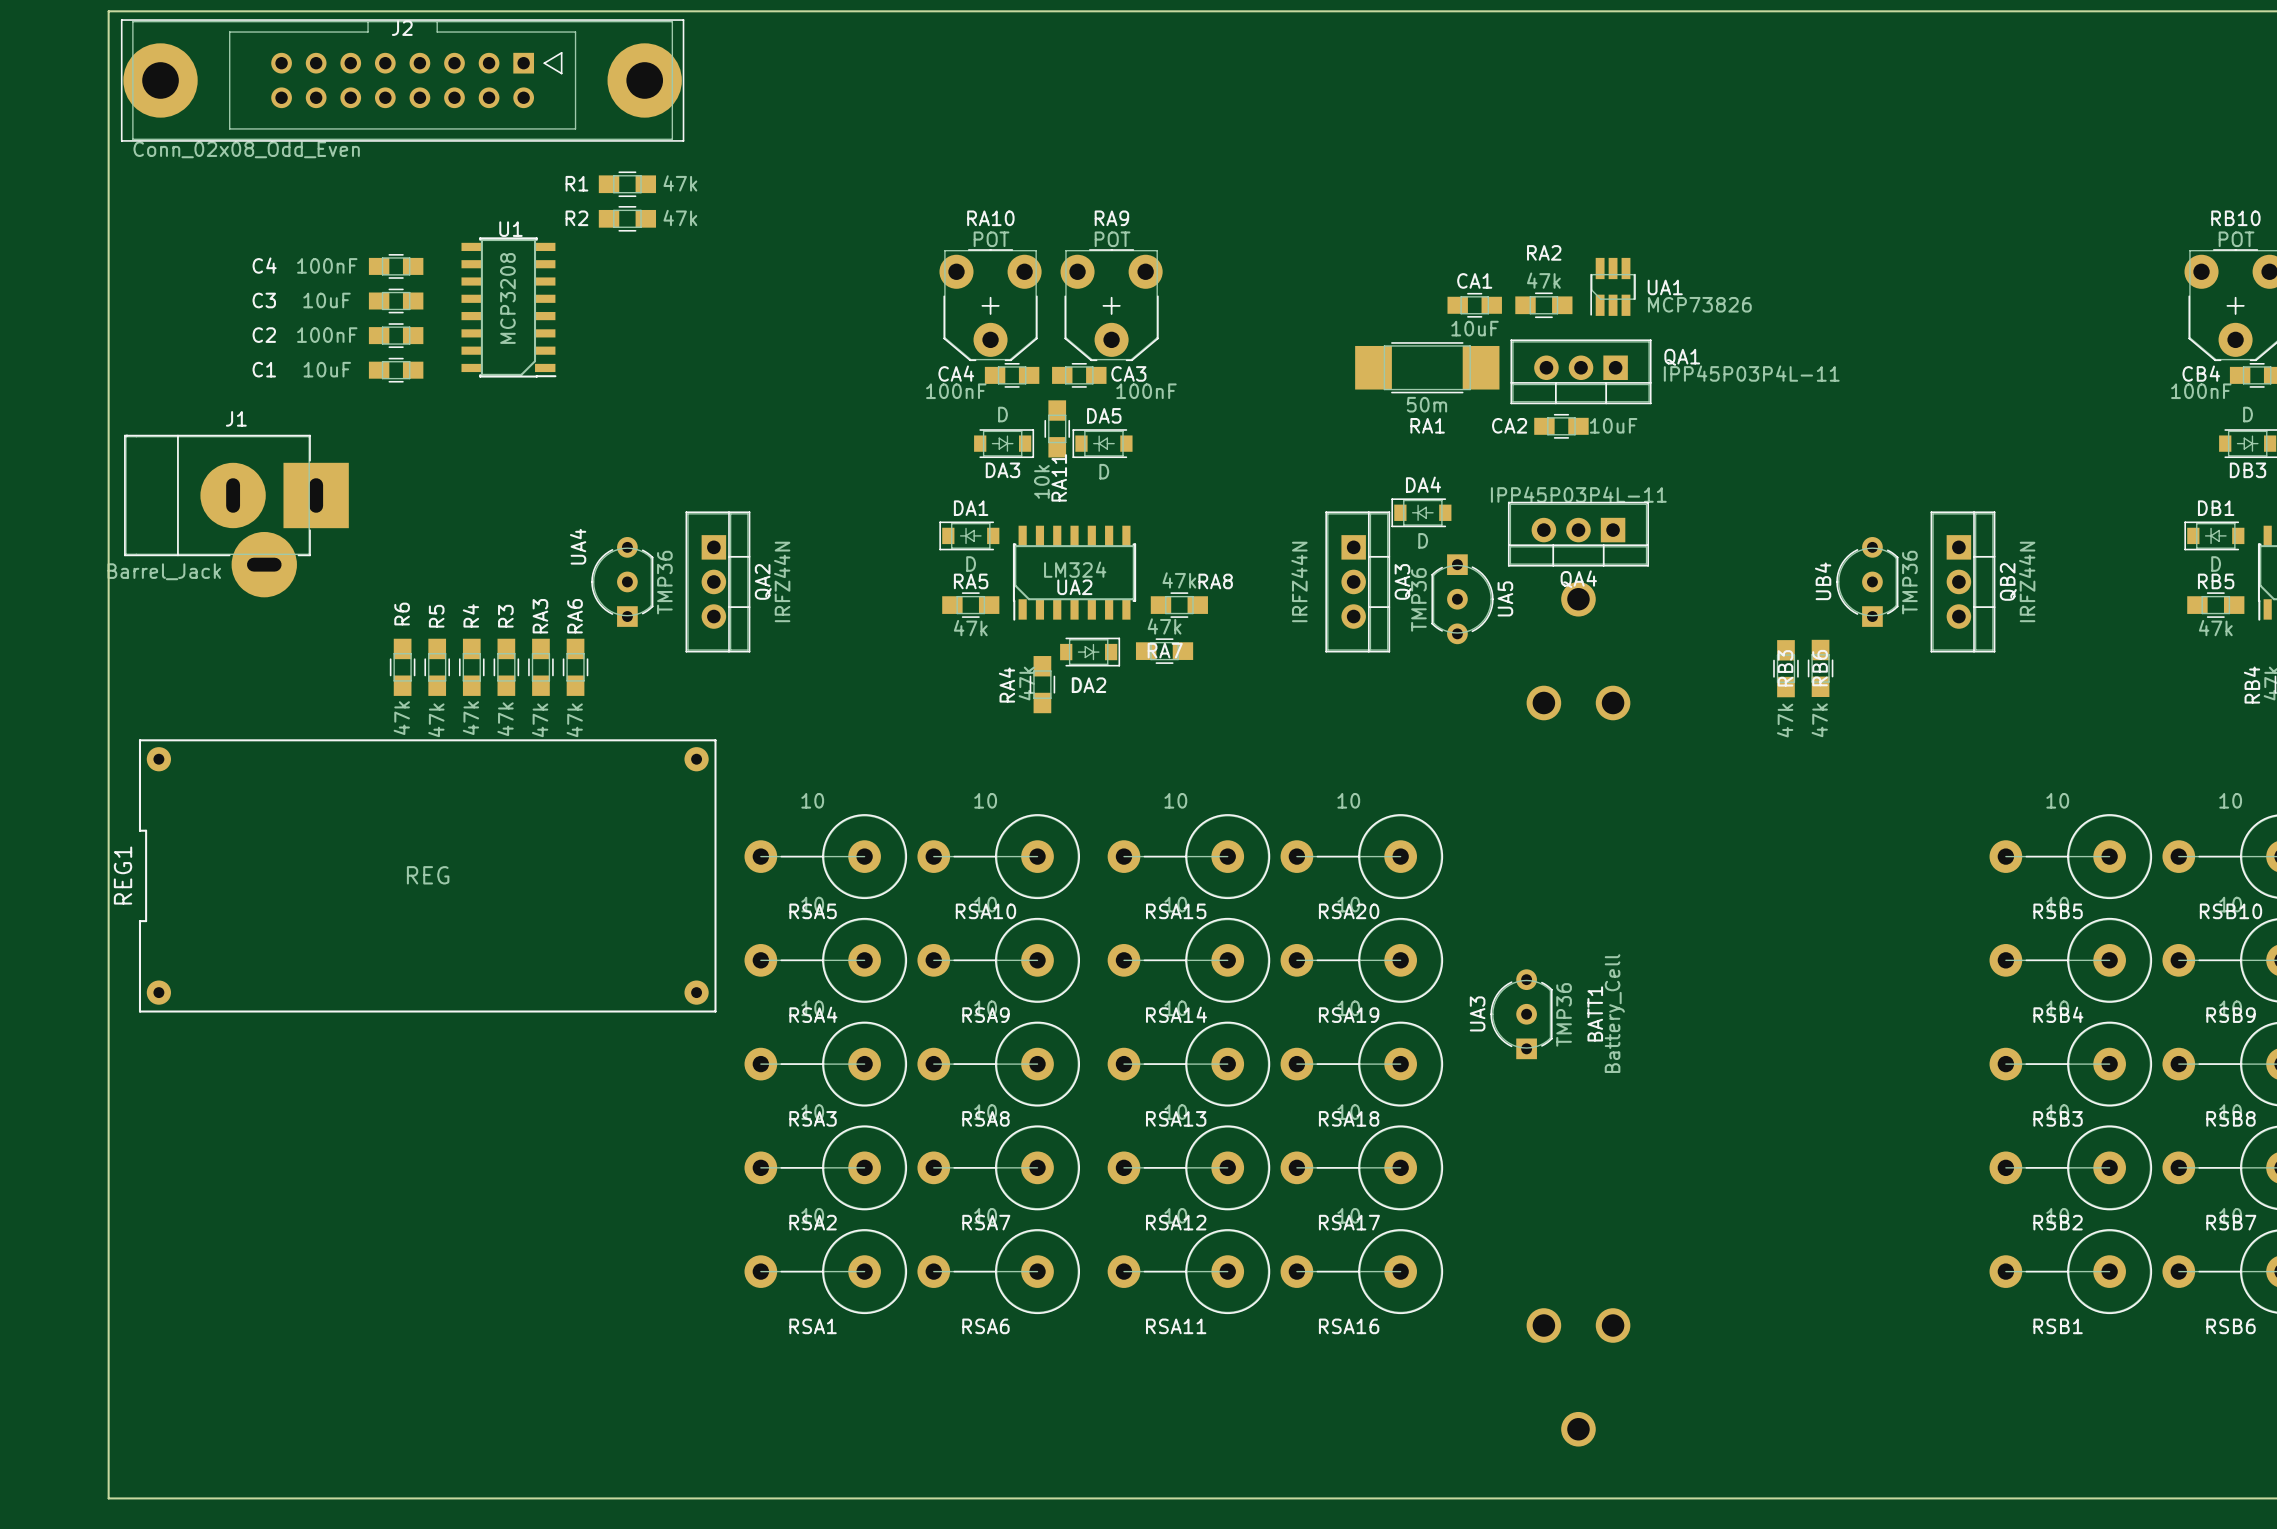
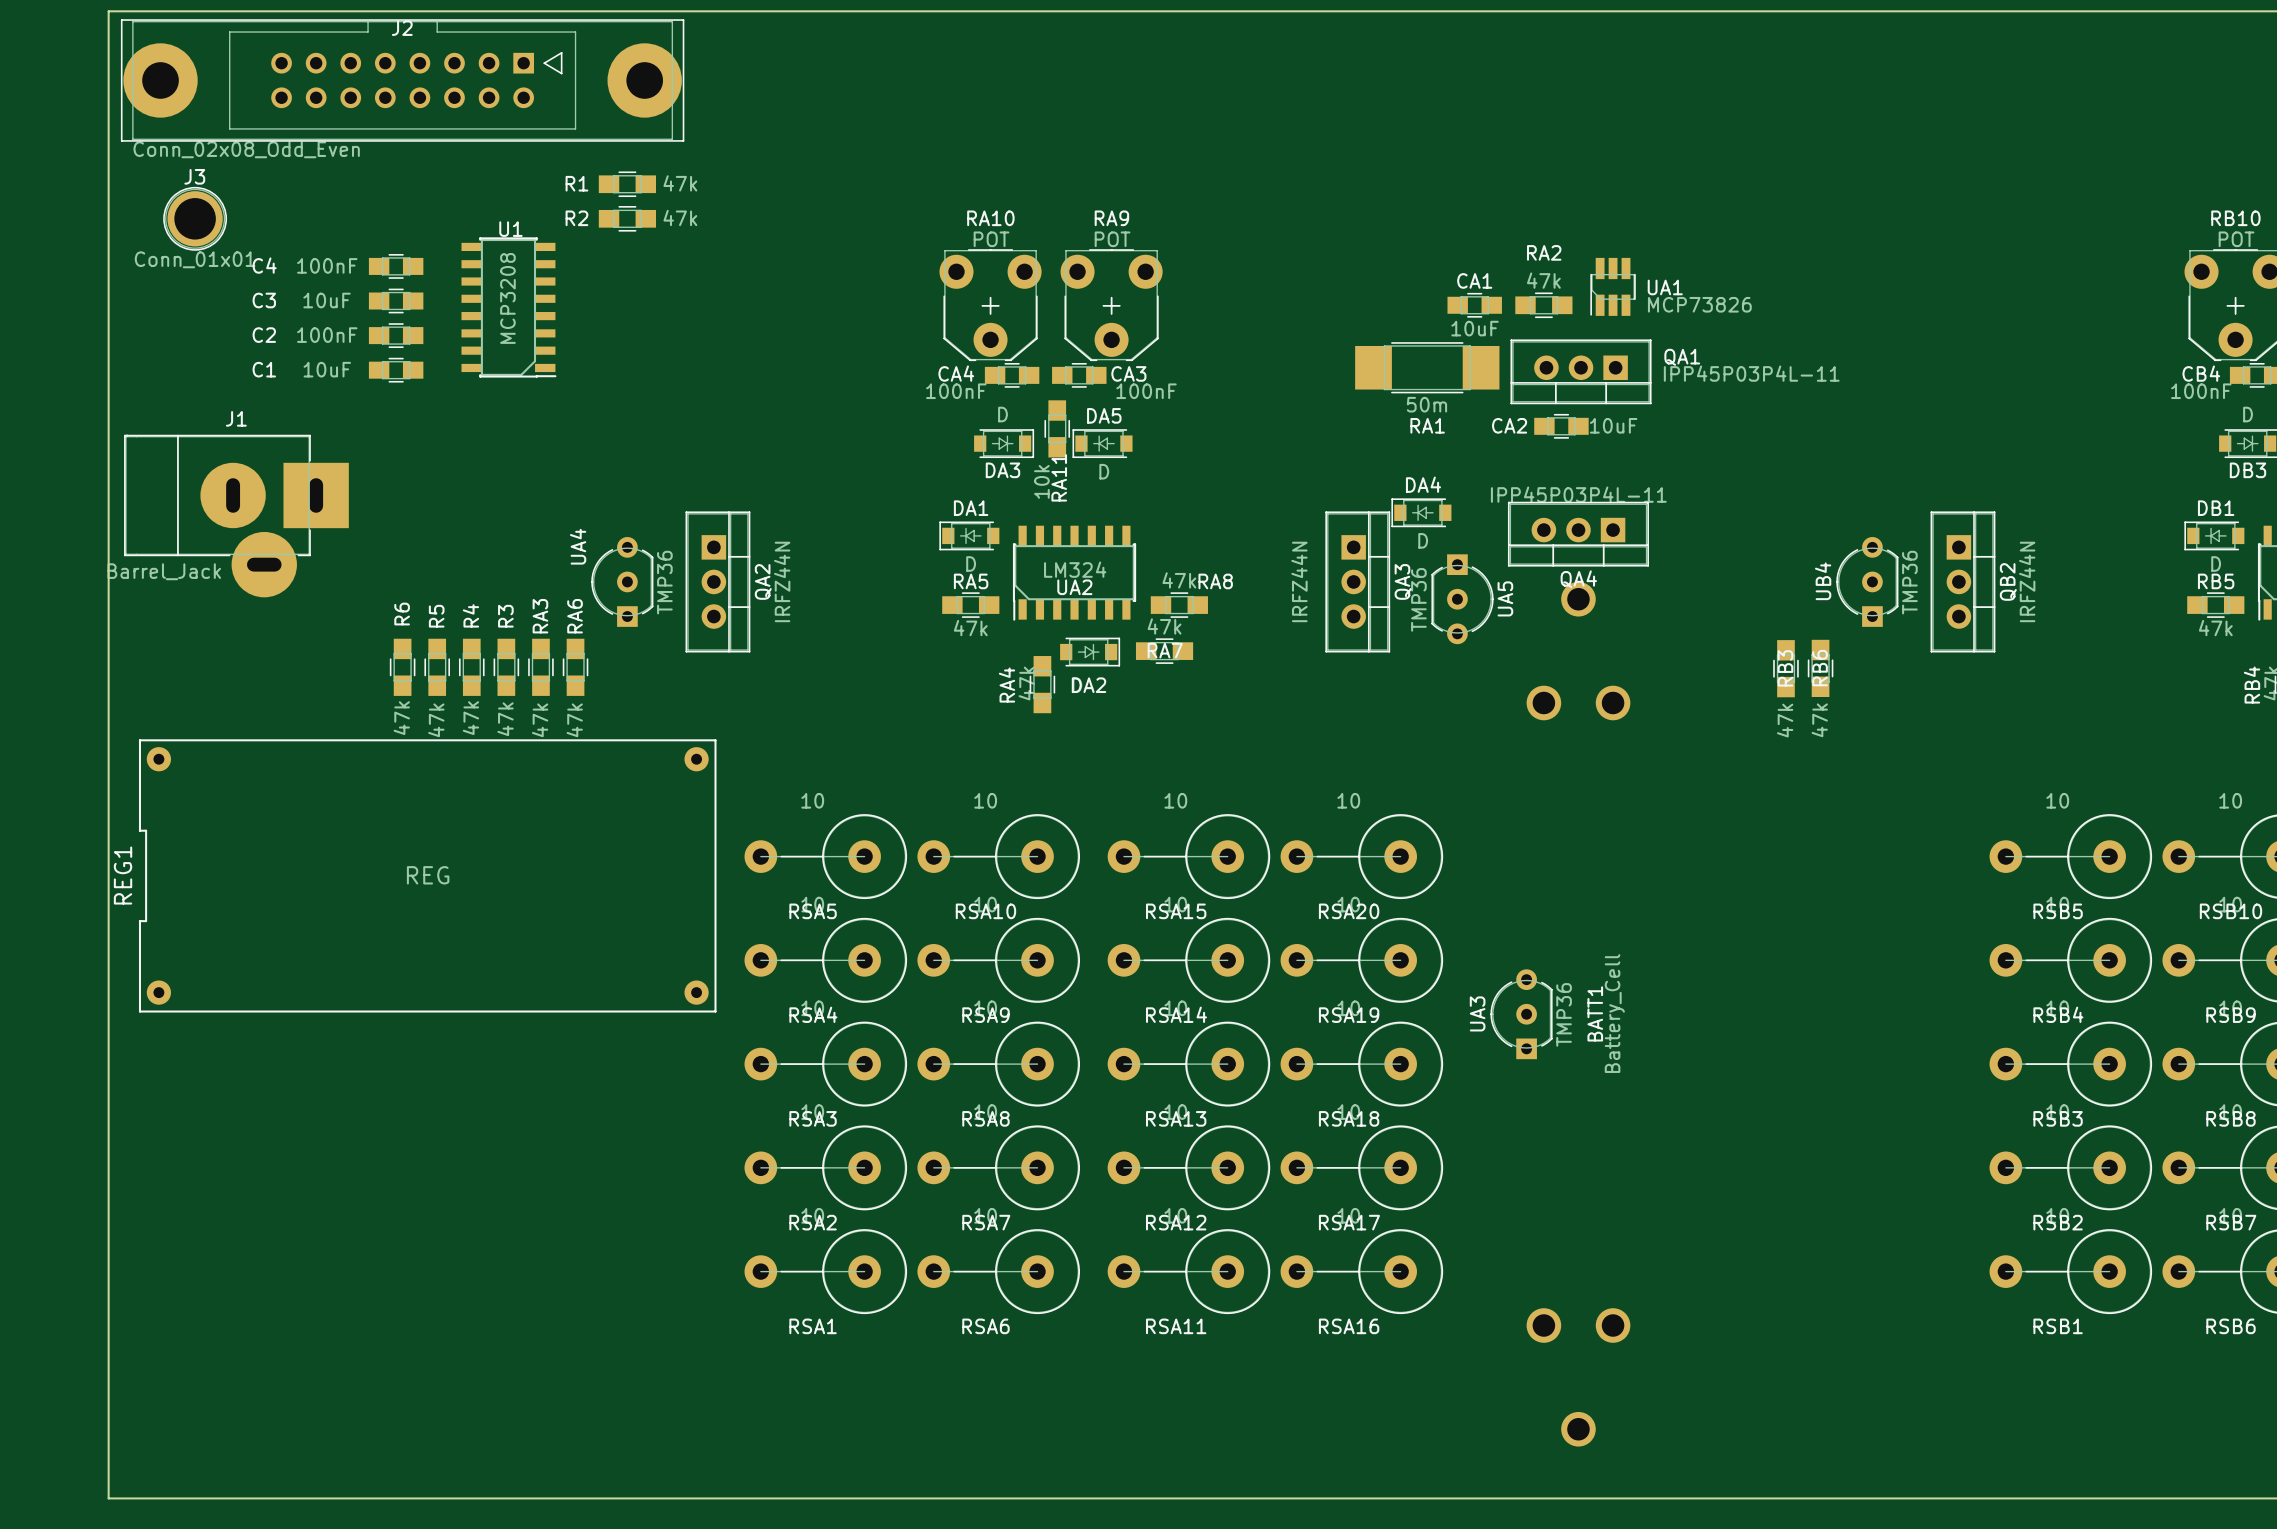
J3: none -> Conn_01x01 (195, 218)

